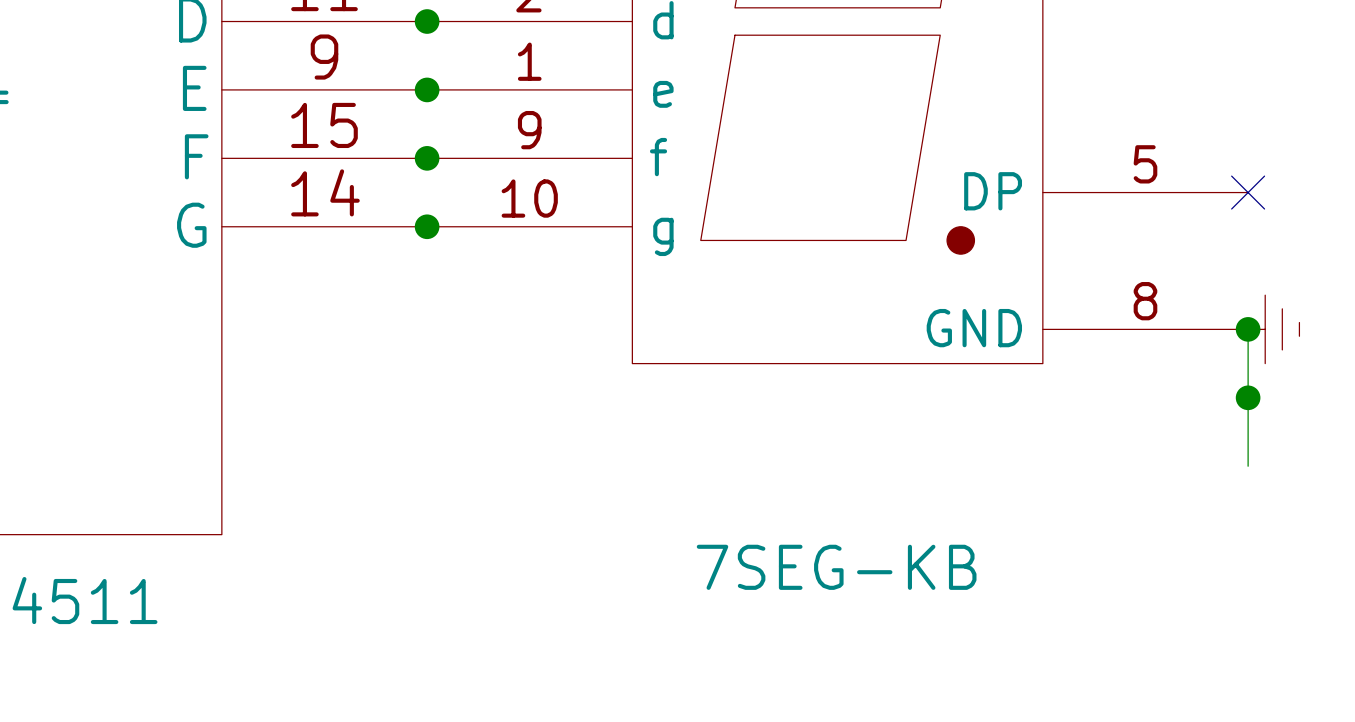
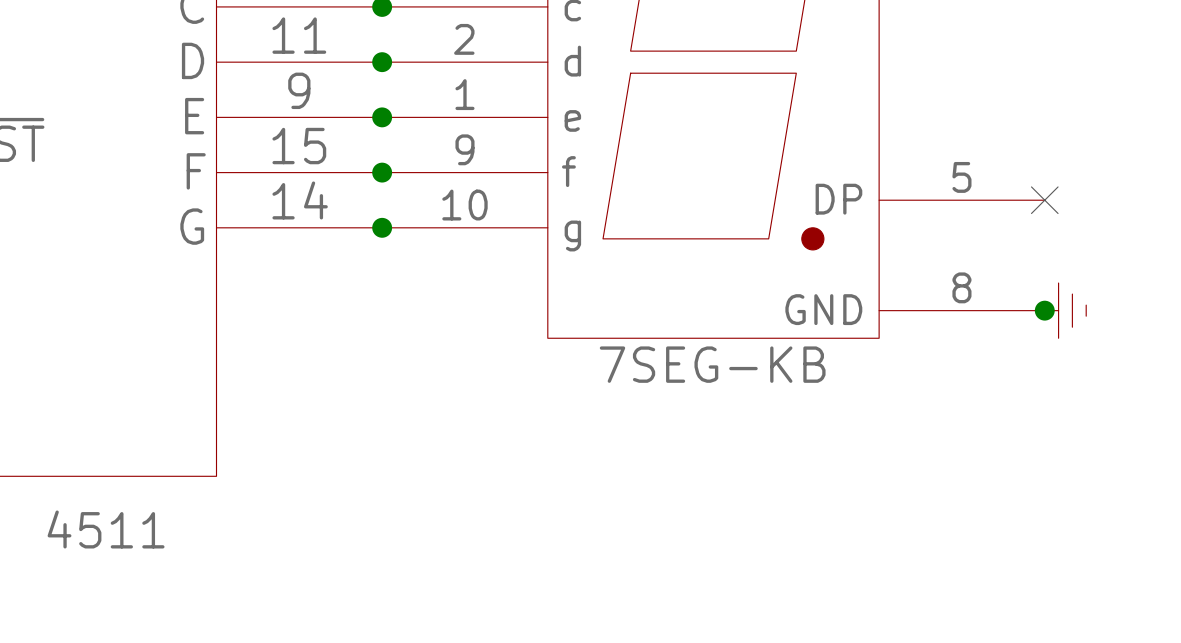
wire: (1248, 329) (1248, 466) -> none
junction: (1248, 397) -> none
part value position: 7SEG-KB (836, 567) -> 7SEG-KB (712, 364)

